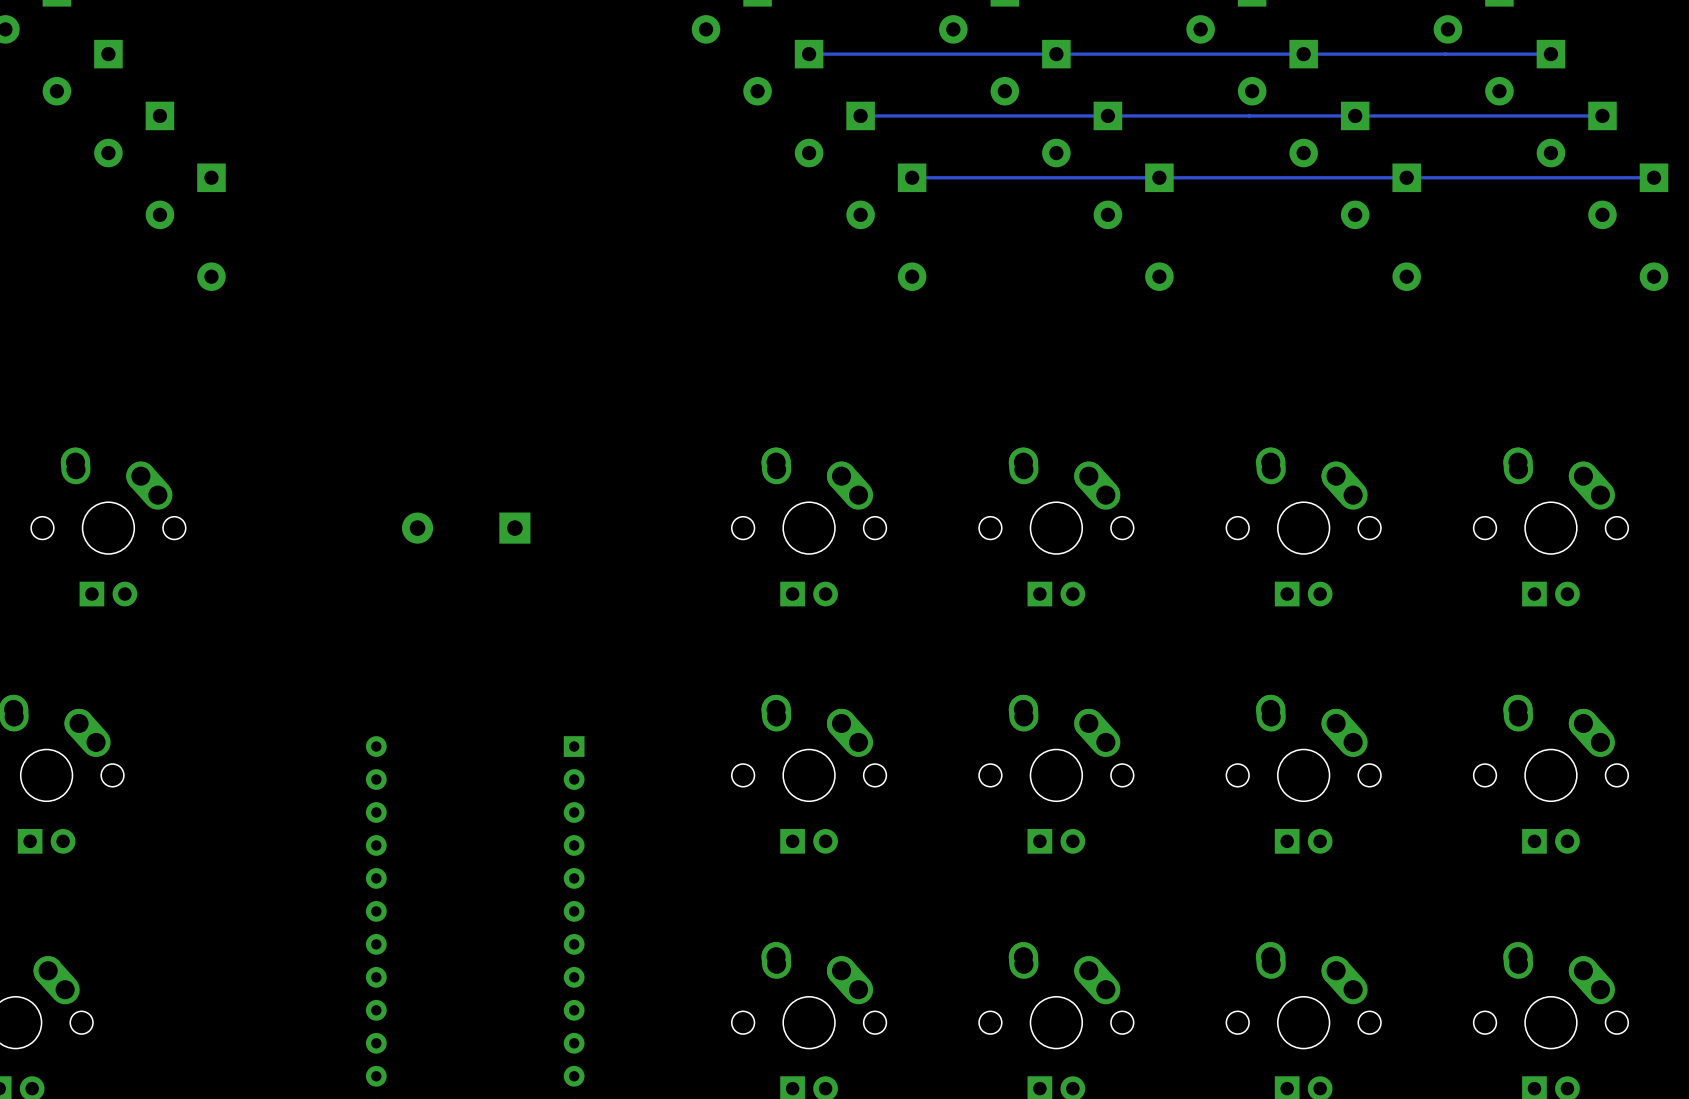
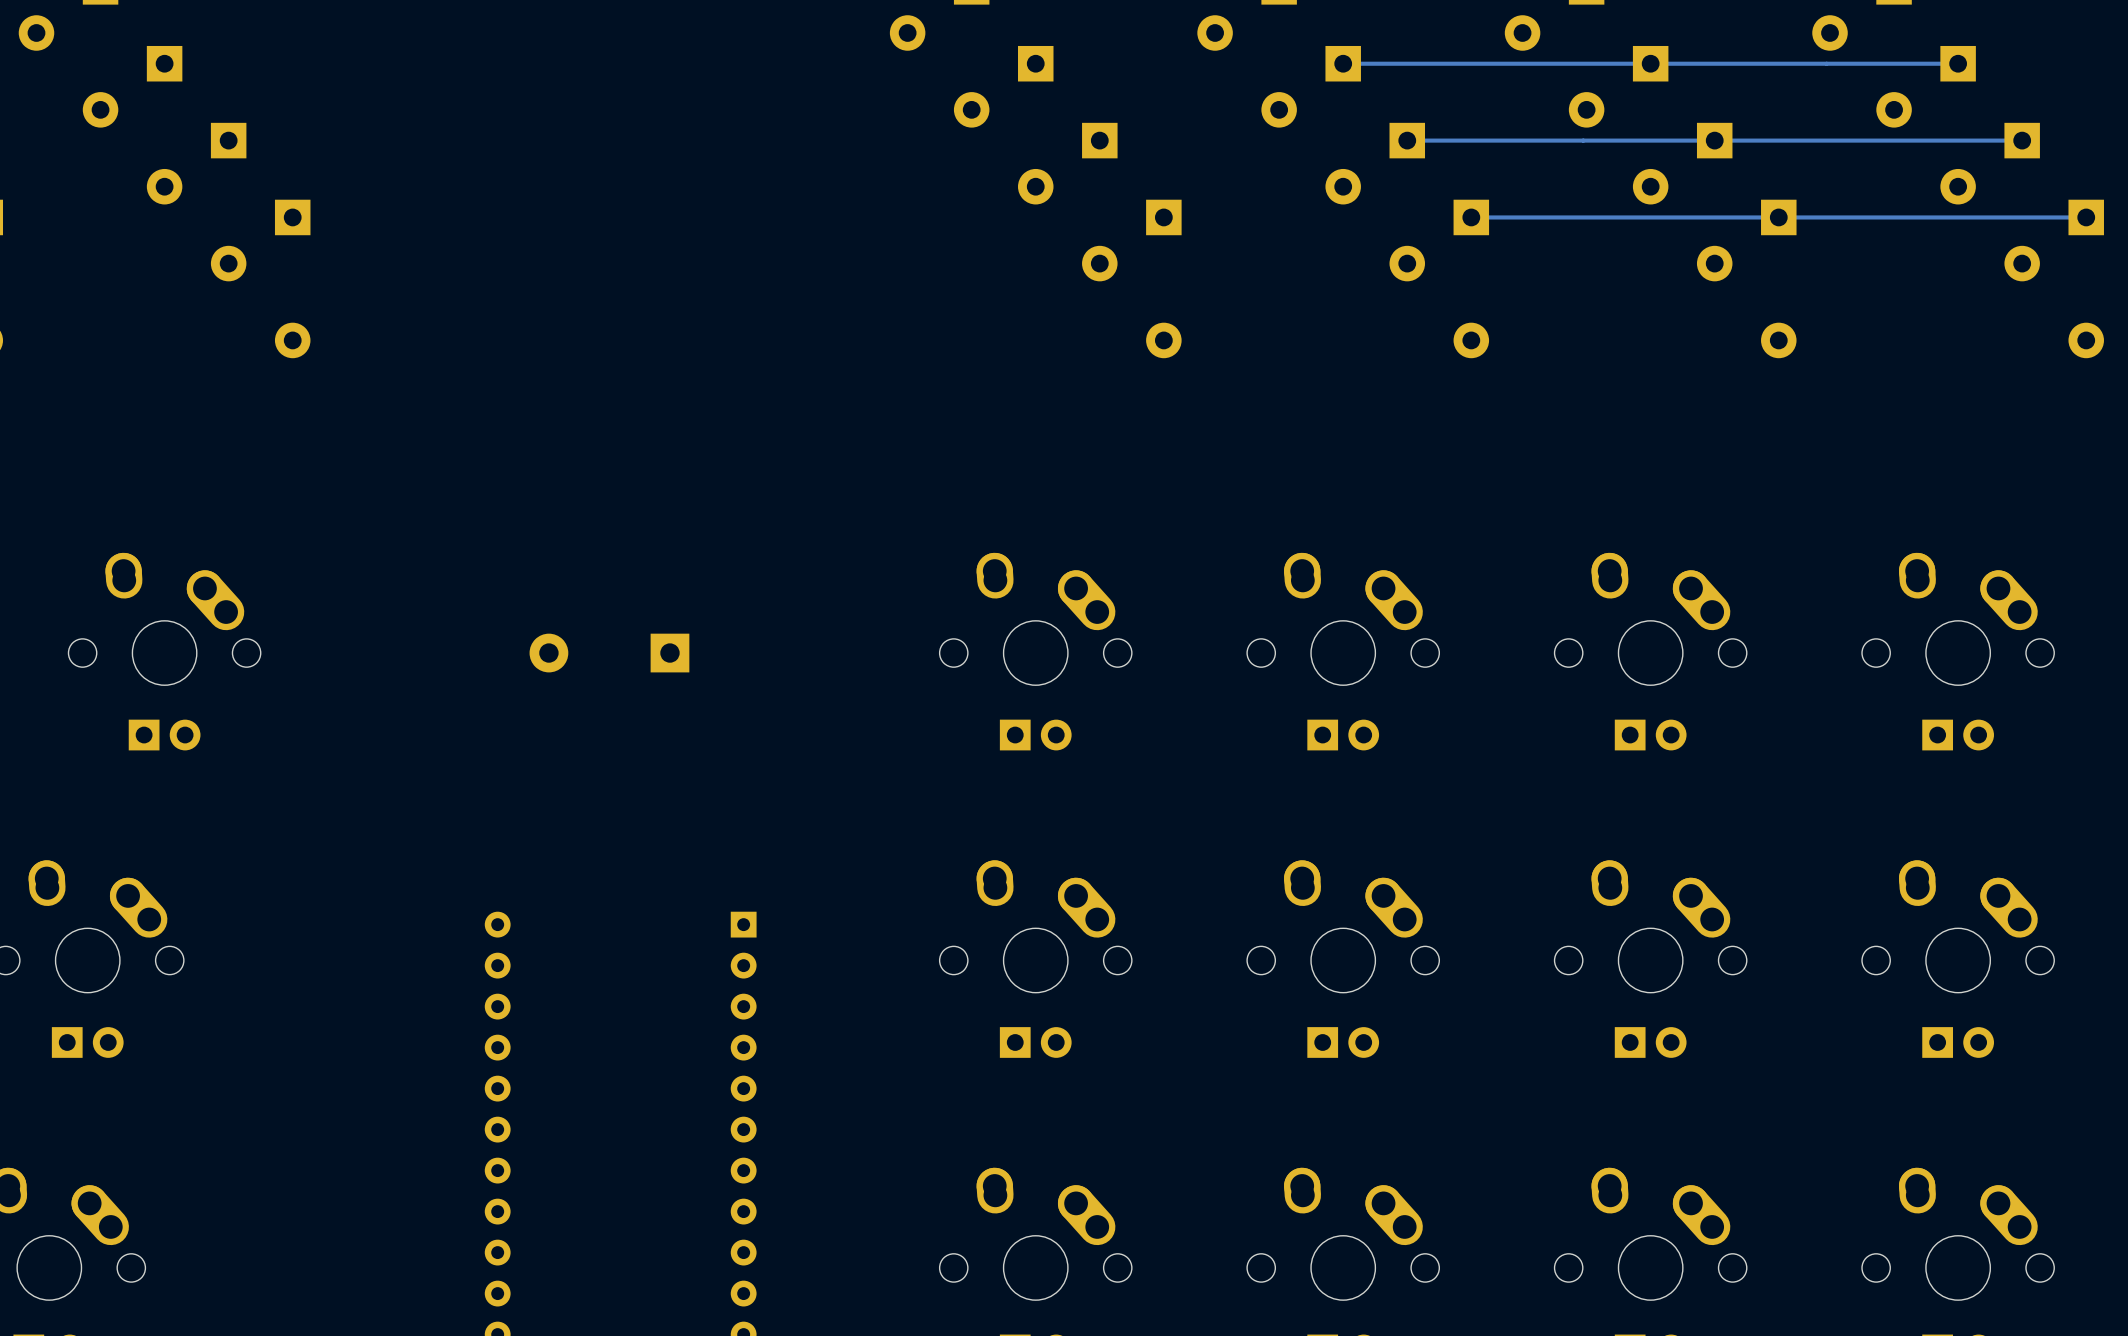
track: (1056, 54) (809, 54) -> none
track: (1107, 115) (860, 115) -> none
track: (1159, 177) (912, 177) -> none

